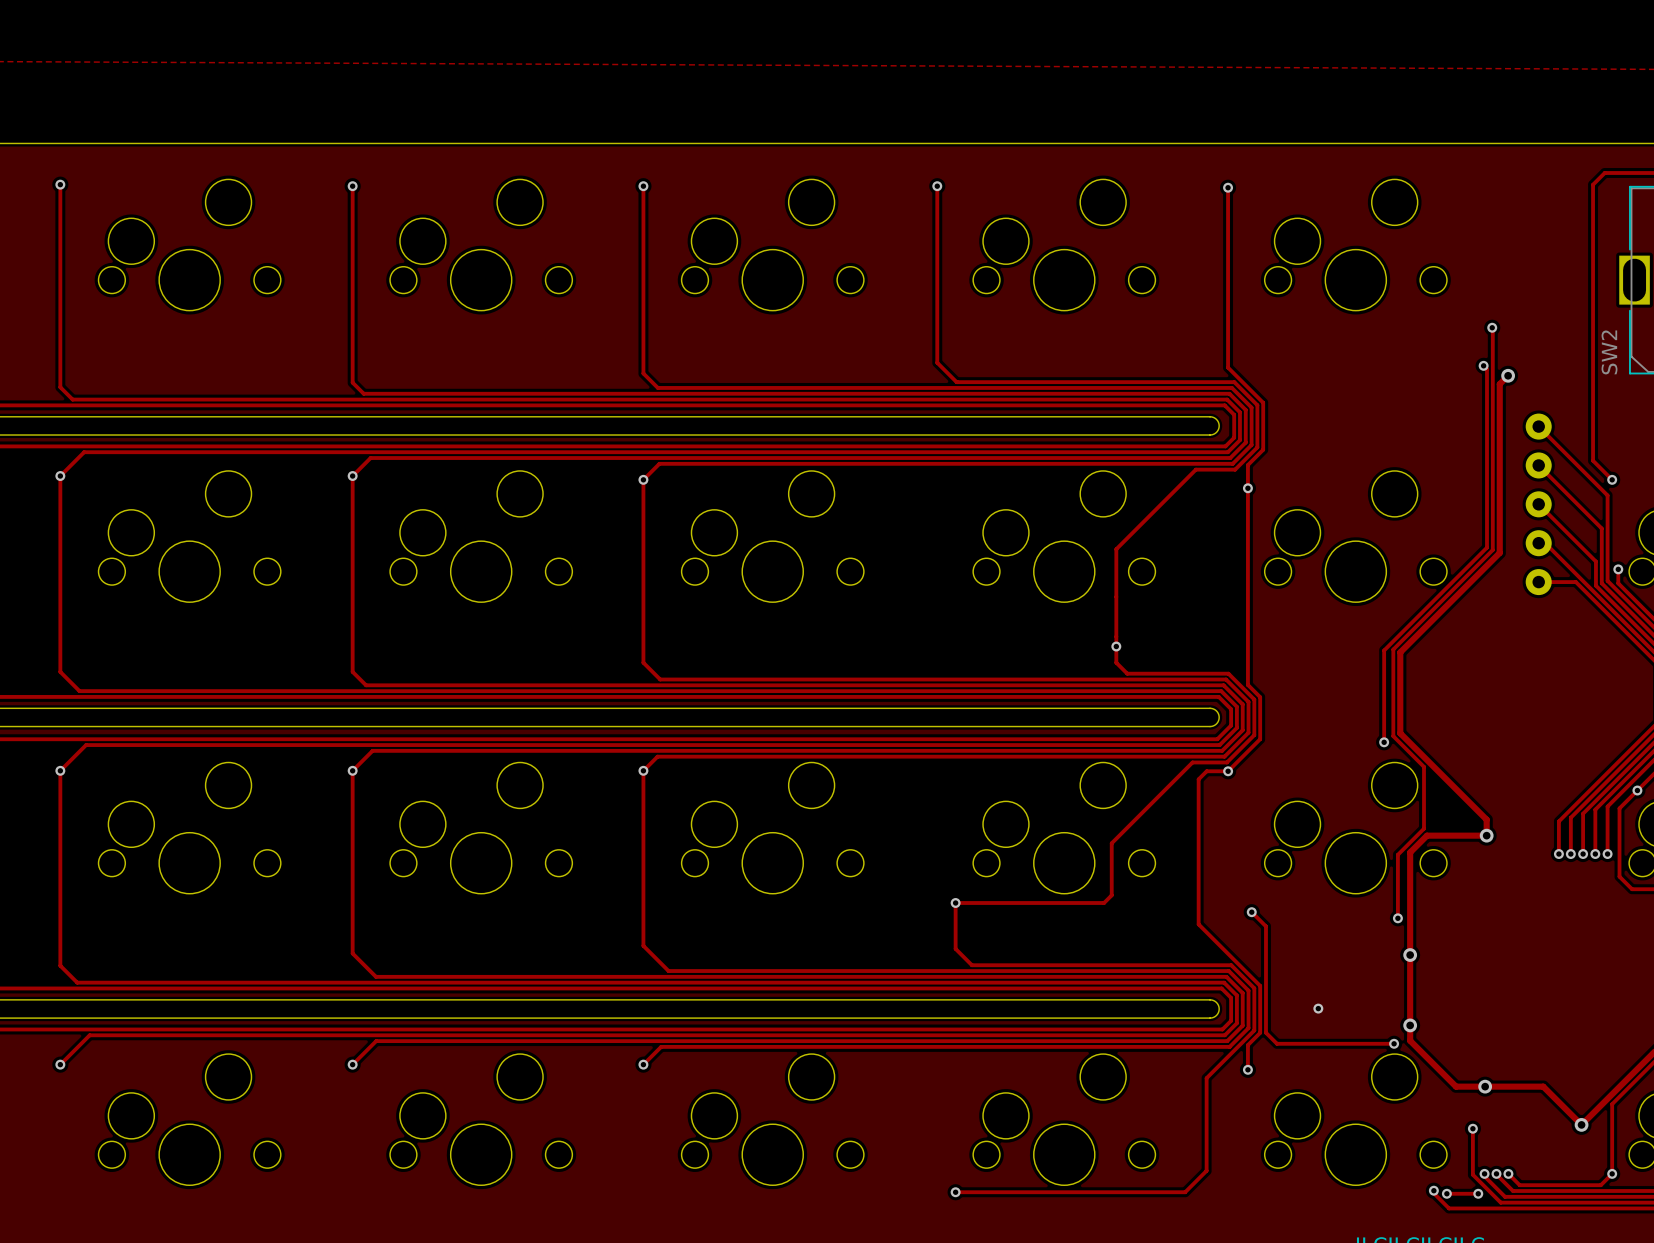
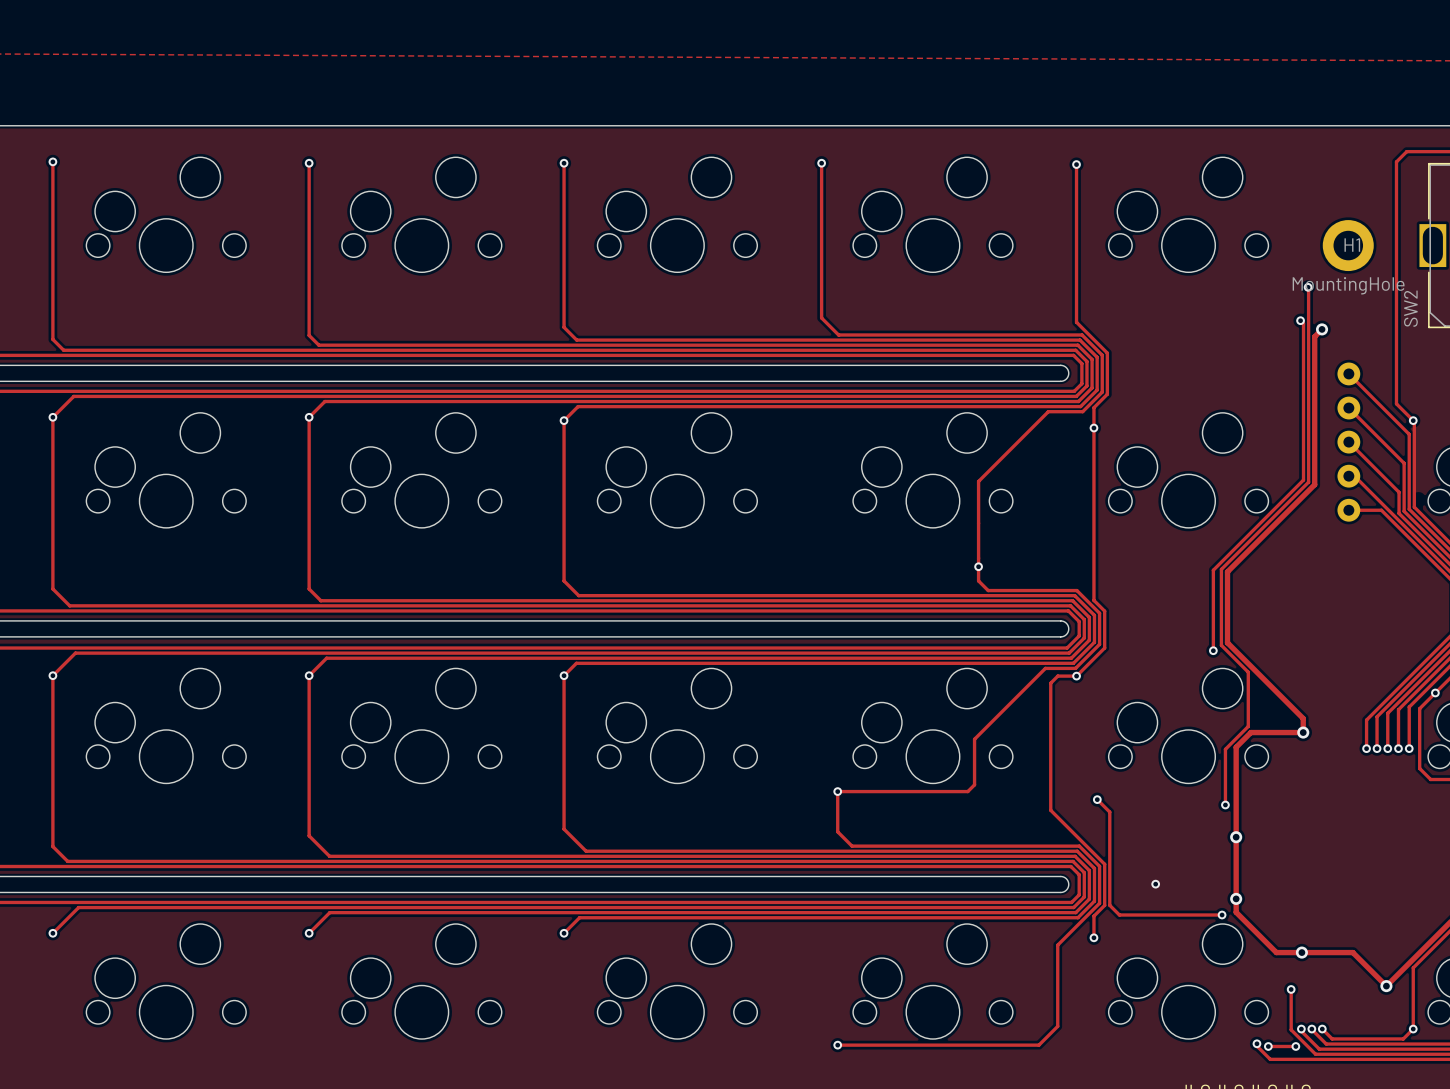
H1: none -> MountingHole (1348, 245)
track: (1618, 569) (1618, 583) -> (1413, 420) (1414, 507) (1418, 511)
via: (1618, 569) -> none

